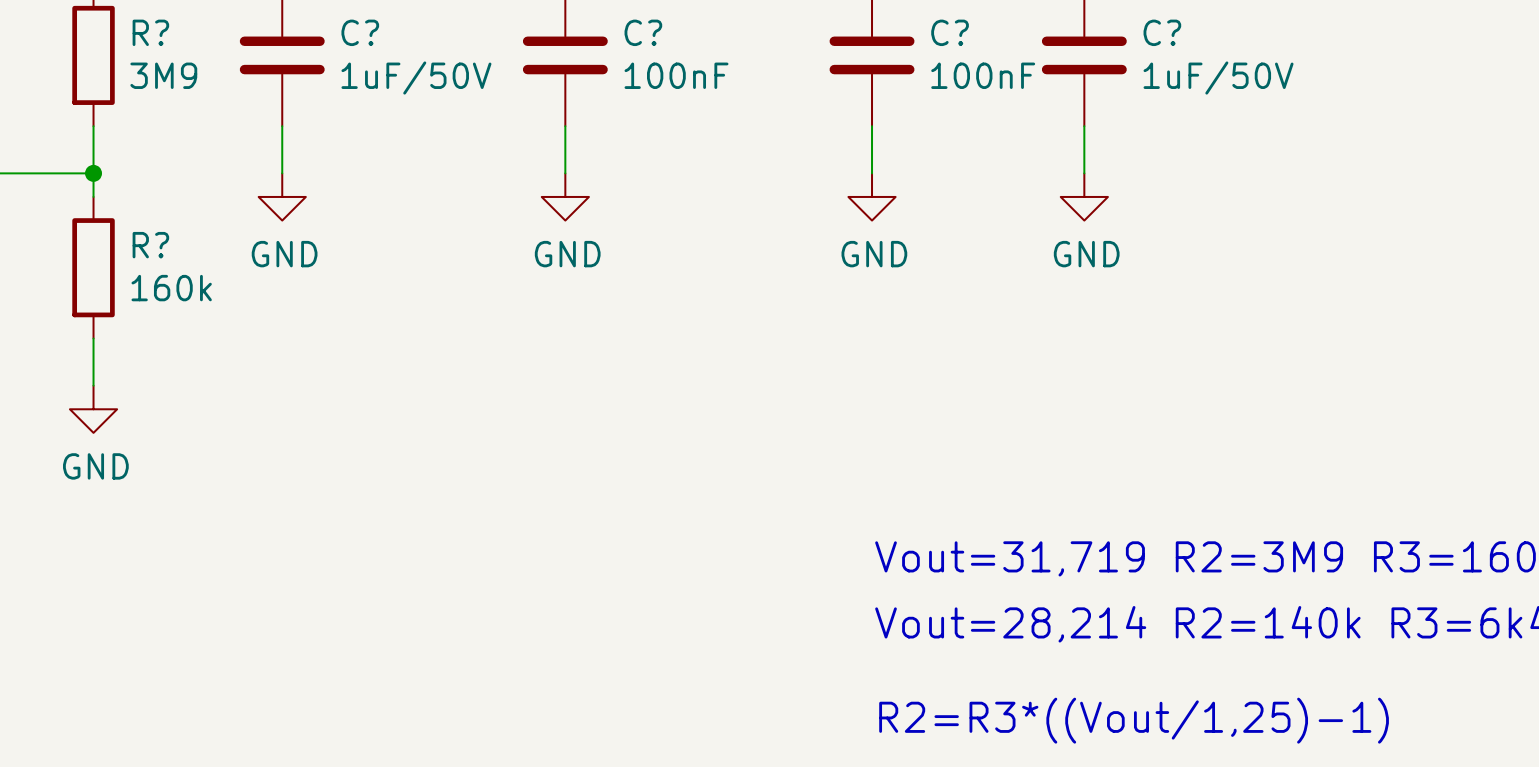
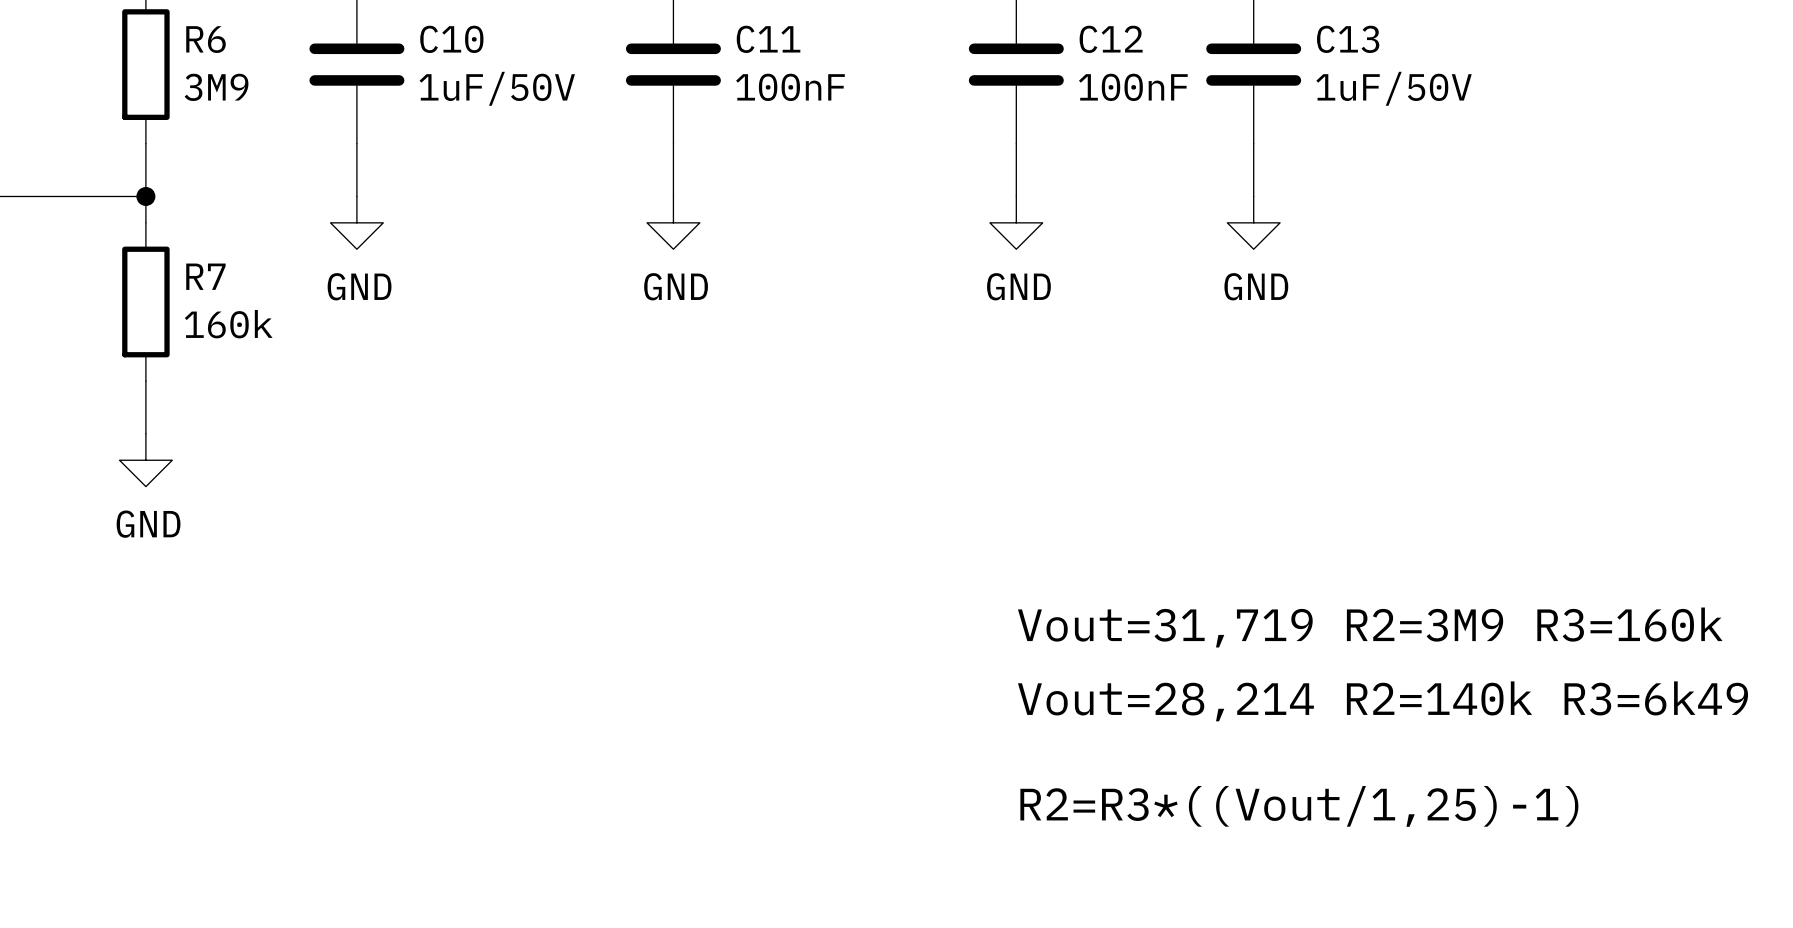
R? name: R? (150, 32) -> R6 (206, 39)
C? name: C? (360, 32) -> C10 (451, 39)
C? name: C? (643, 32) -> C11 (768, 39)
C? name: C? (950, 32) -> C12 (1111, 39)
C? name: C? (1162, 32) -> C13 (1348, 39)
R? name: R? (150, 245) -> R7 (205, 276)

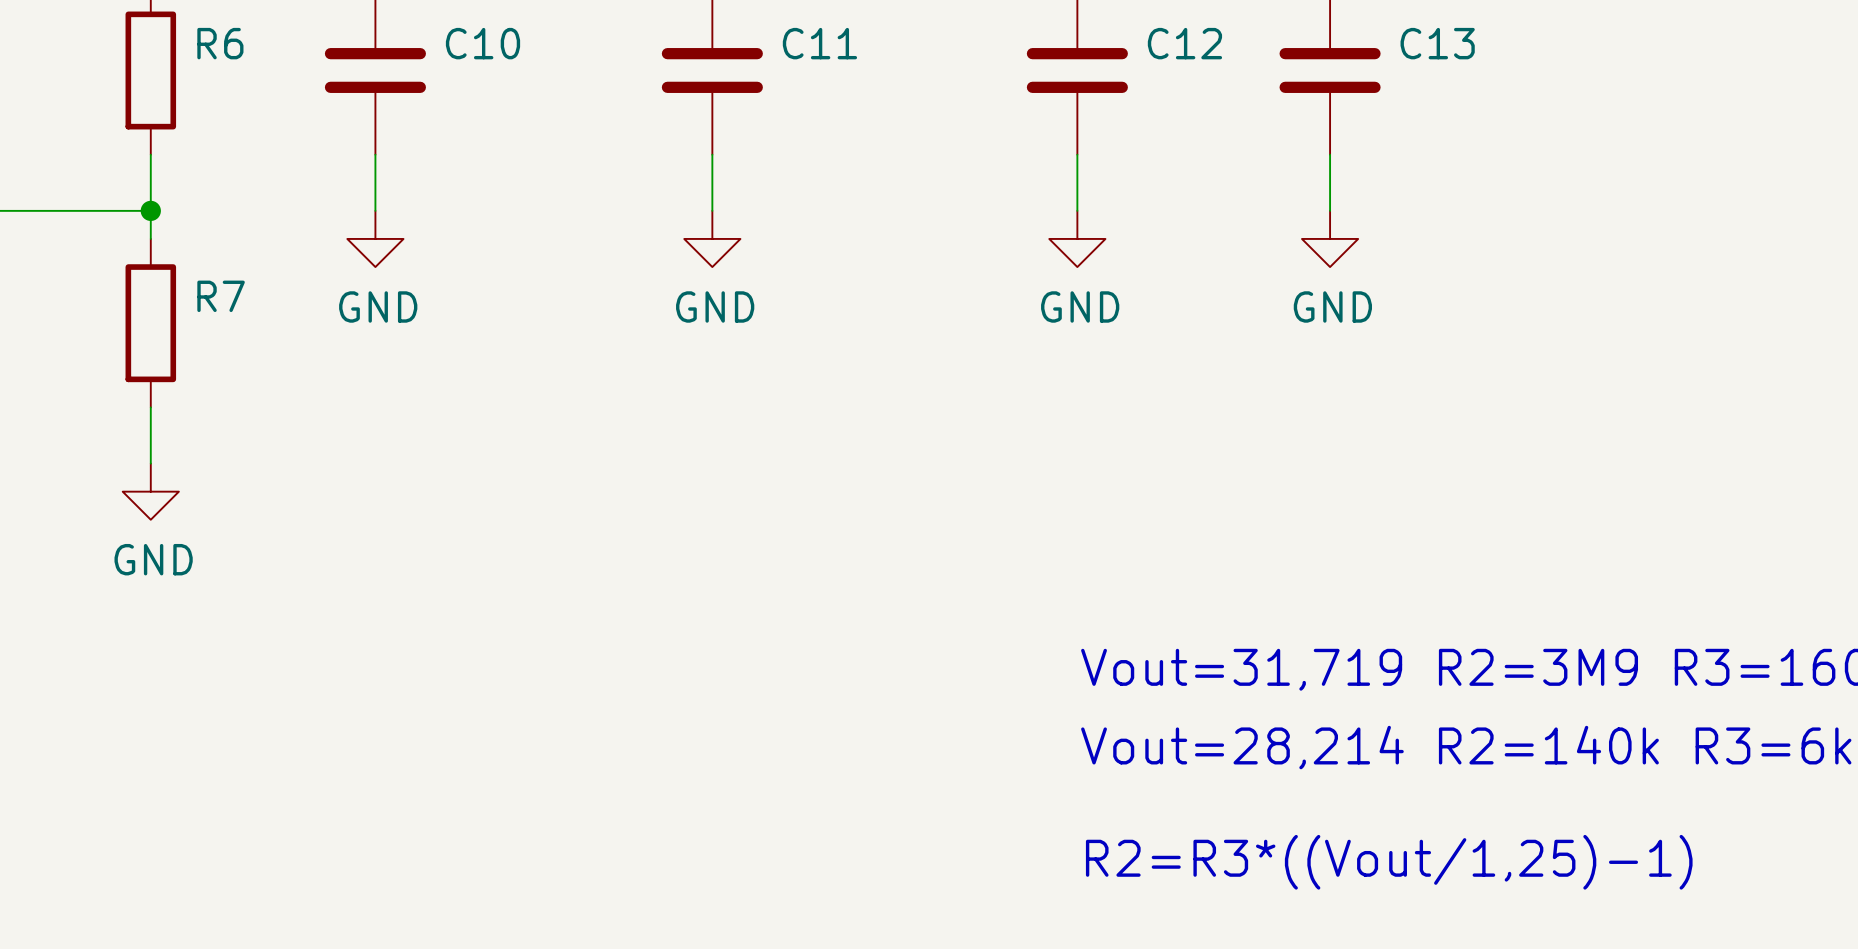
R6 value: 3M9 (216, 87) -> none
C11 value: 100nF (790, 87) -> none
C12 value: 100nF (1133, 87) -> none
C10 value: 1uF/50V (497, 88) -> none
C13 value: 1uF/50V (1394, 88) -> none
R7 value: 160k (228, 324) -> none

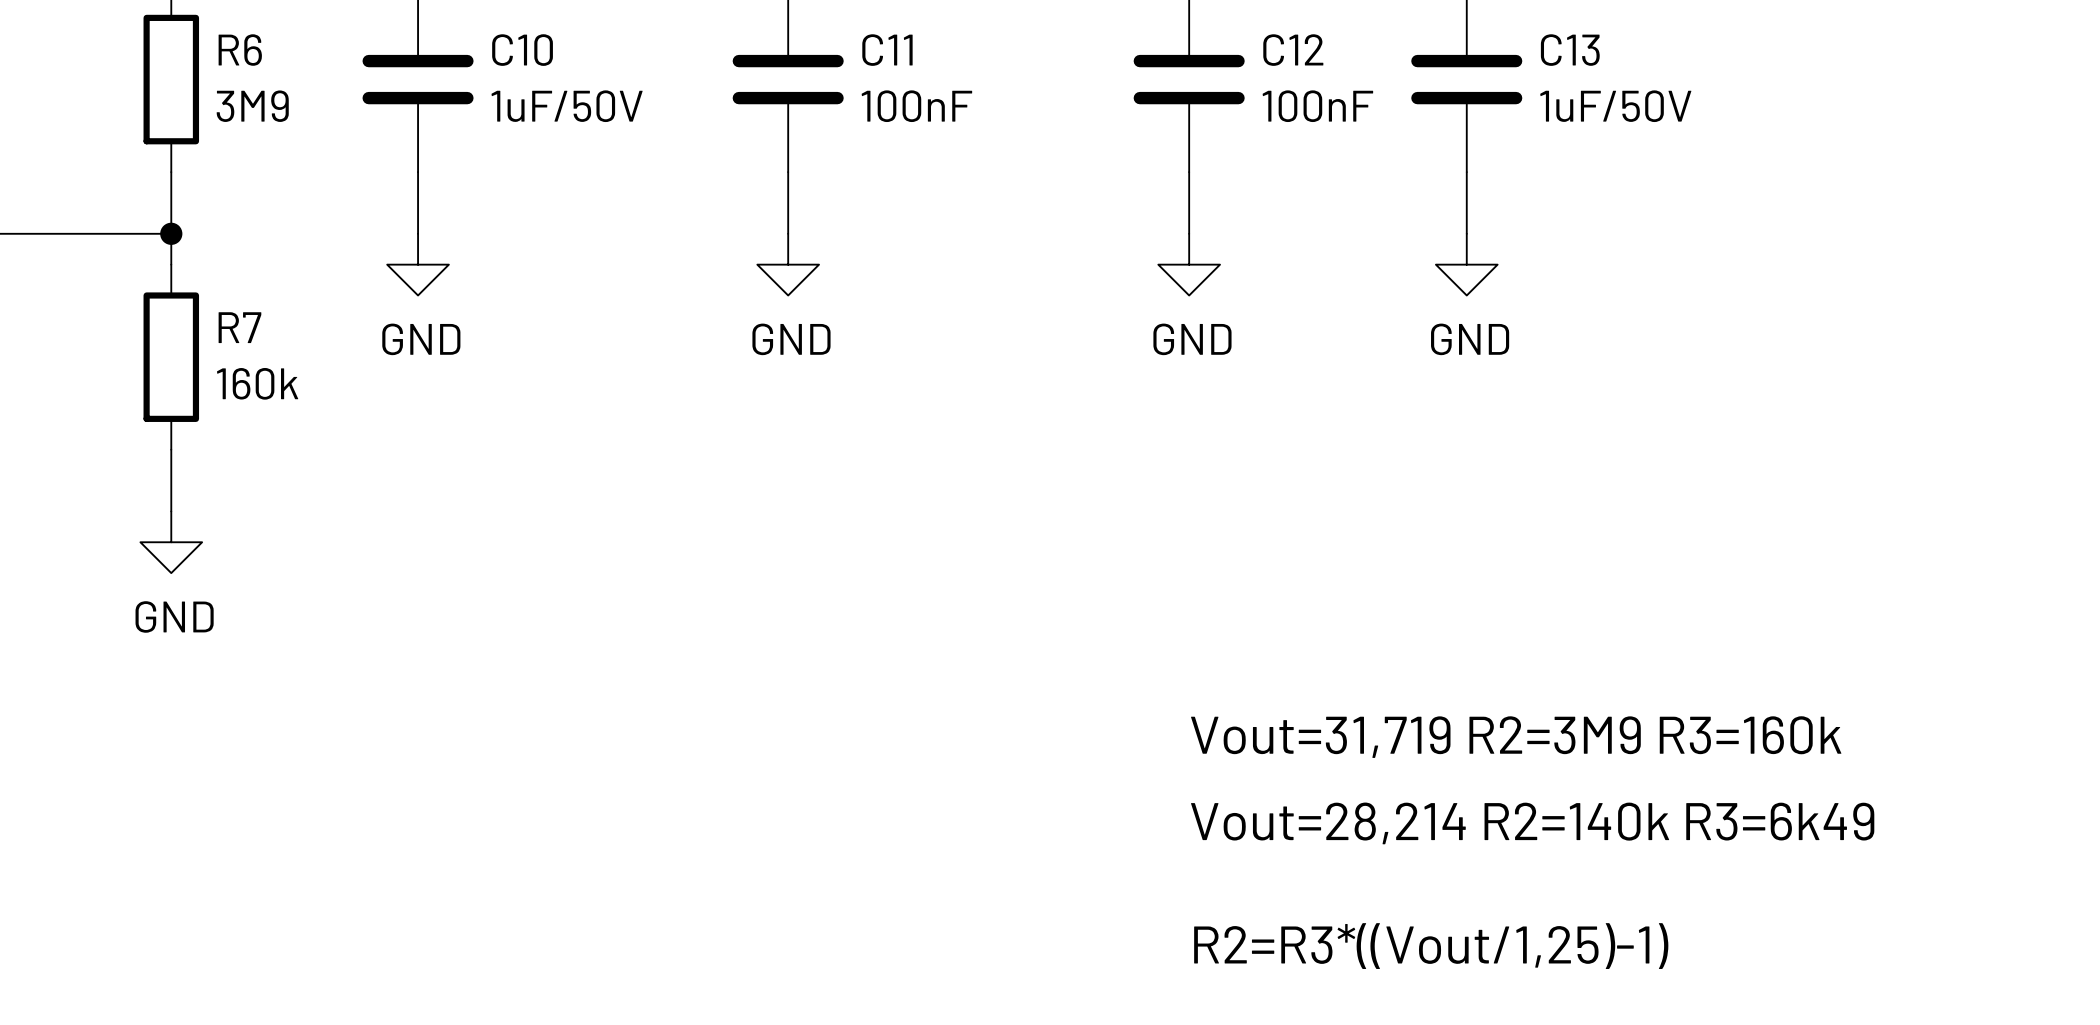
R6 value: none -> 3M9 (252, 106)
C11 value: none -> 100nF (916, 106)
C12 value: none -> 100nF (1317, 106)
C10 value: none -> 1uF/50V (567, 106)
C13 value: none -> 1uF/50V (1615, 106)
R7 value: none -> 160k (257, 383)

